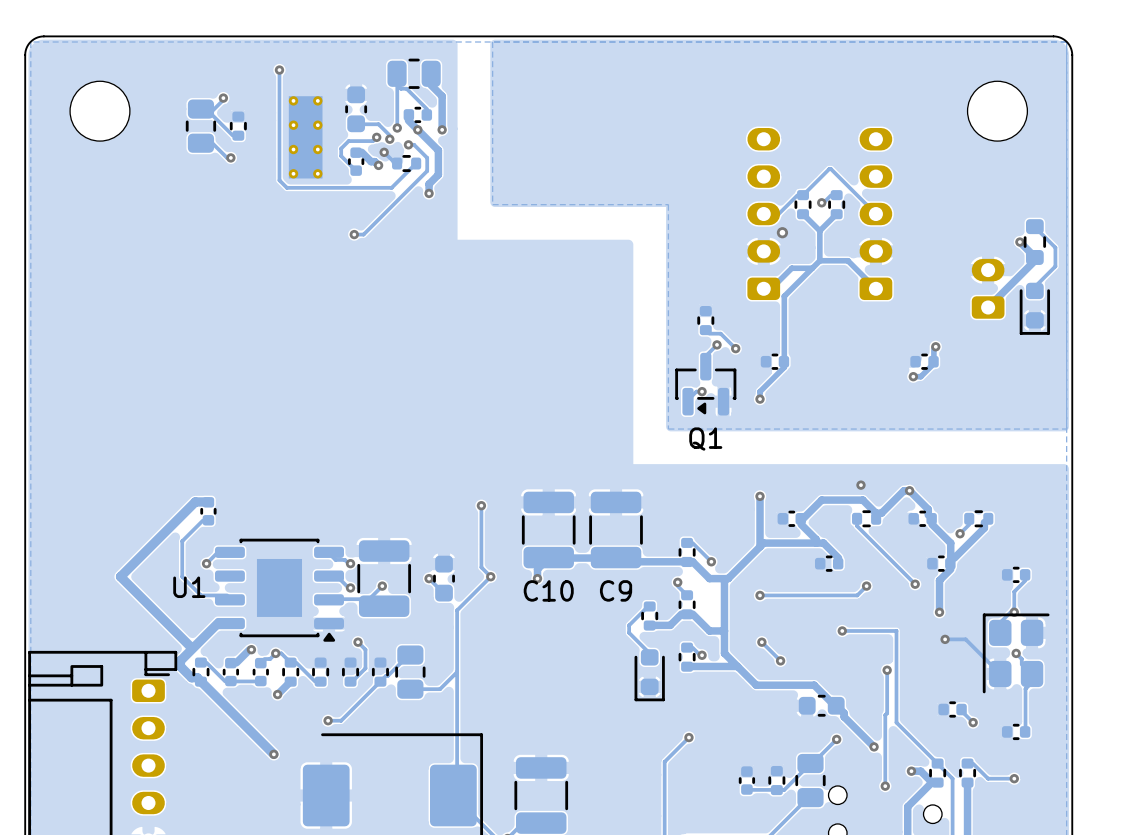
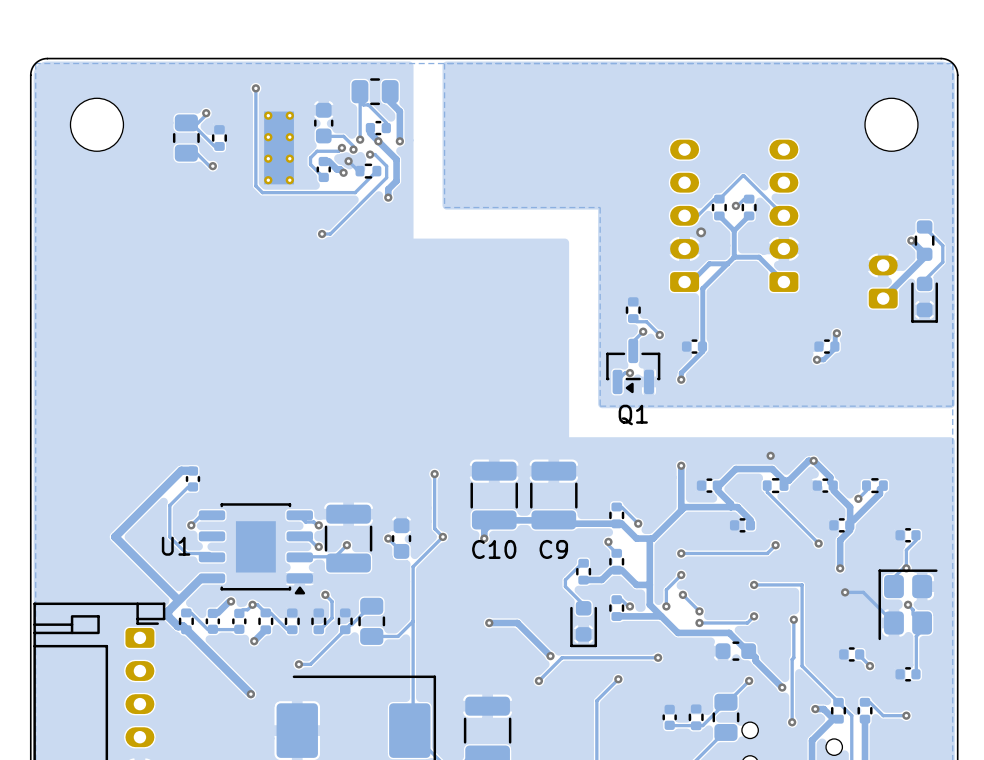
track: none -> (681, 574) (666, 589) (666, 606)
via: none -> (681, 574)
via: none -> (666, 606)
track: none -> (754, 616) (747, 623) (701, 623)
via: none -> (754, 616)
track: none -> (489, 623) (517, 623) (550, 656)
via: none -> (489, 623)
via: none -> (699, 623)
via: none -> (550, 656)
track: none -> (658, 657) (562, 657) (538, 680)
via: none -> (658, 657)
via: none -> (538, 680)

